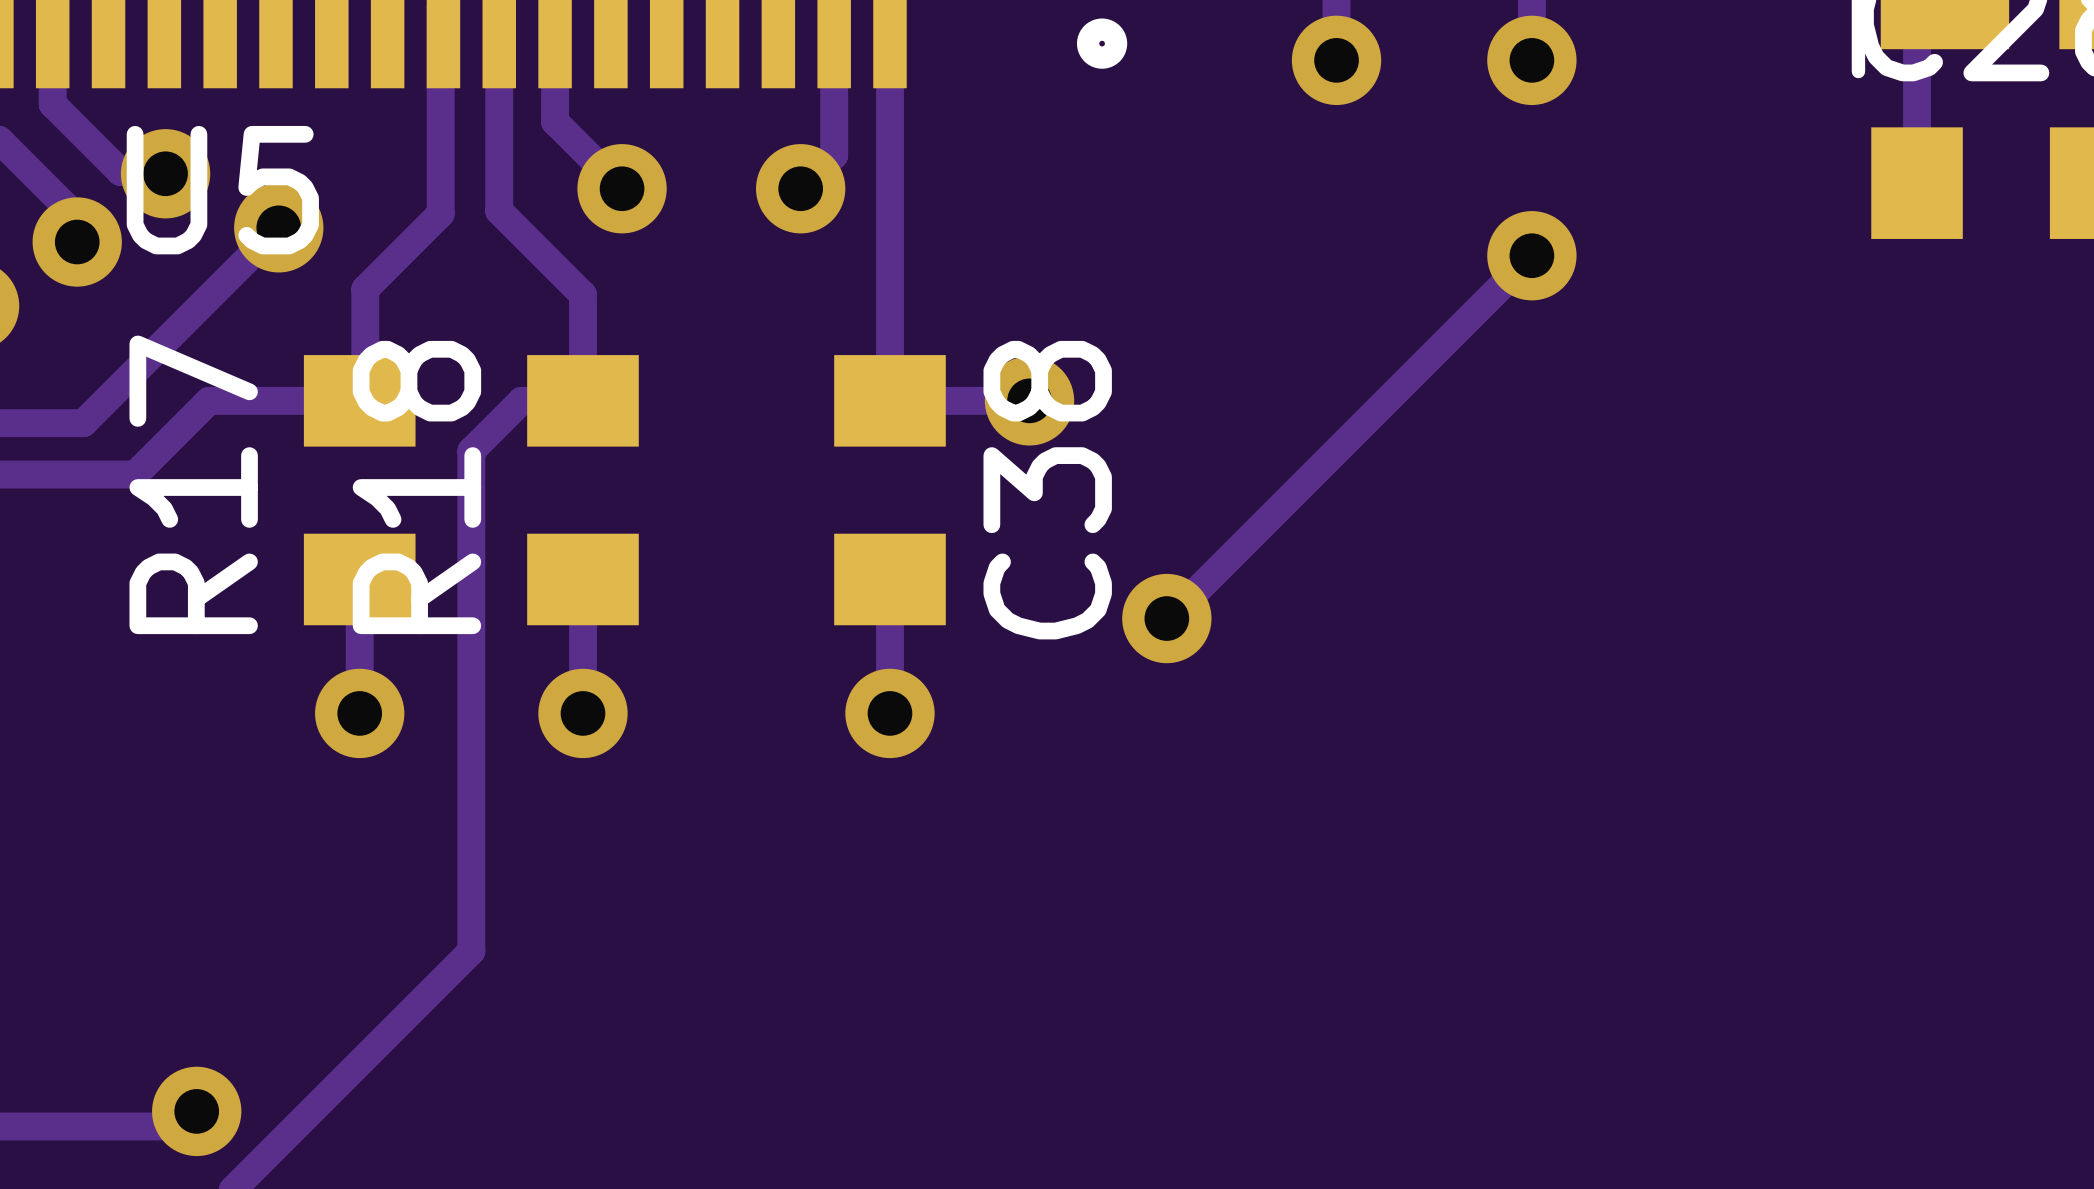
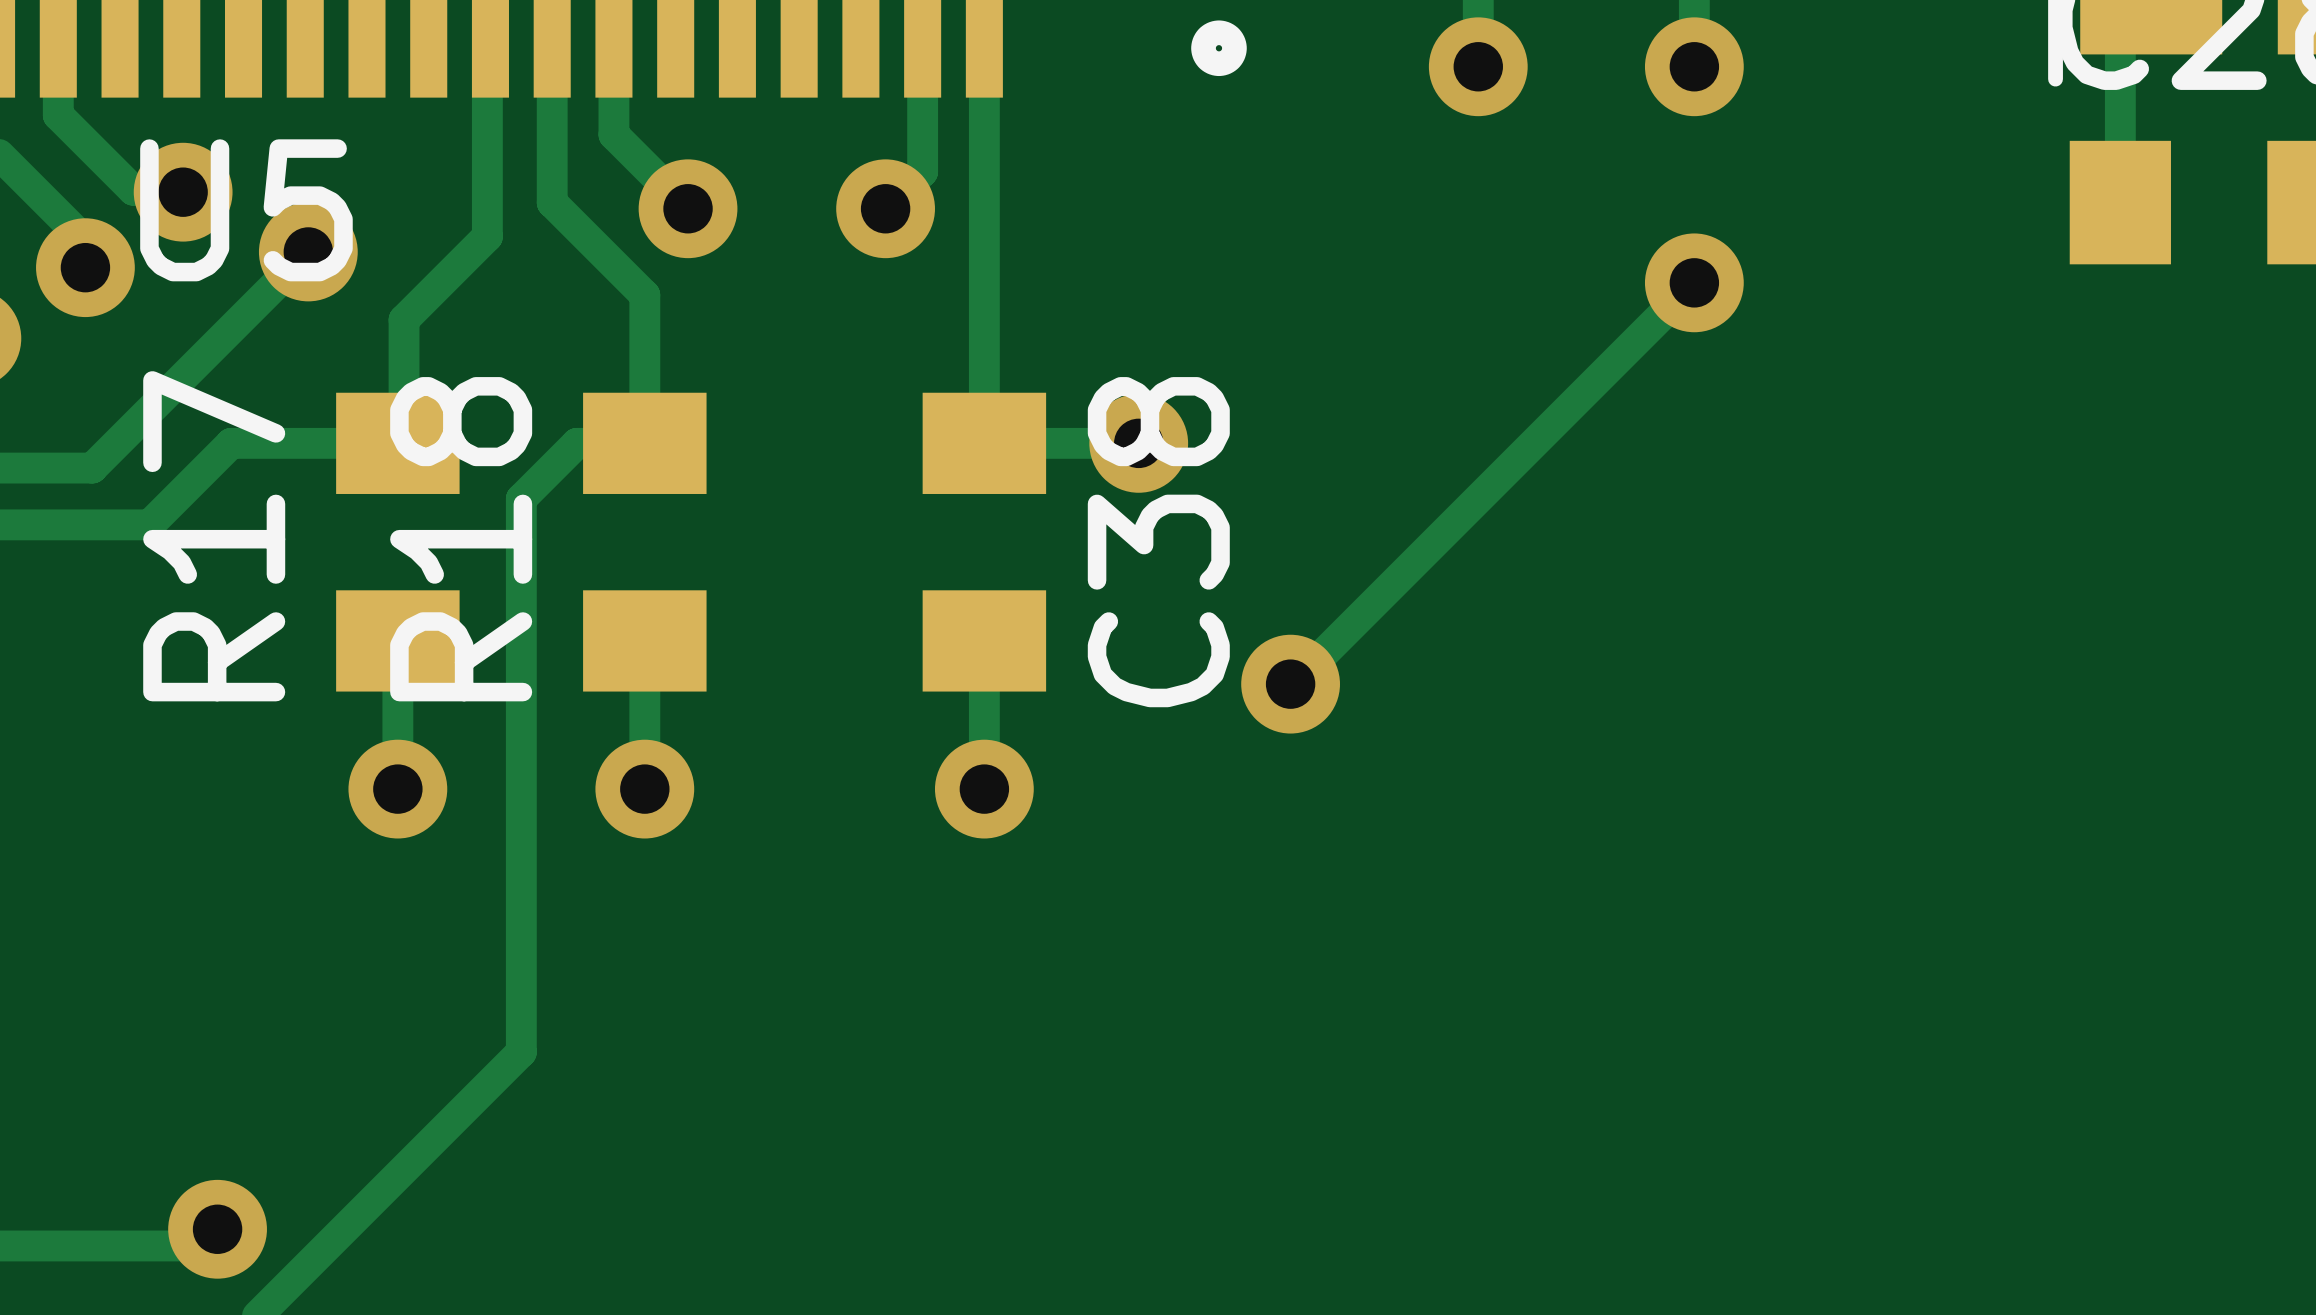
track: (499, 183) (499, 211) (582, 294) -> (552, 202) (644, 295) (644, 326)

